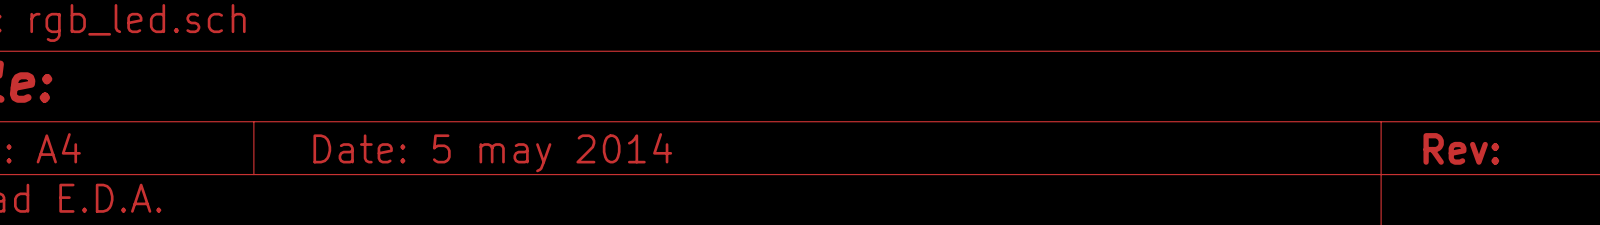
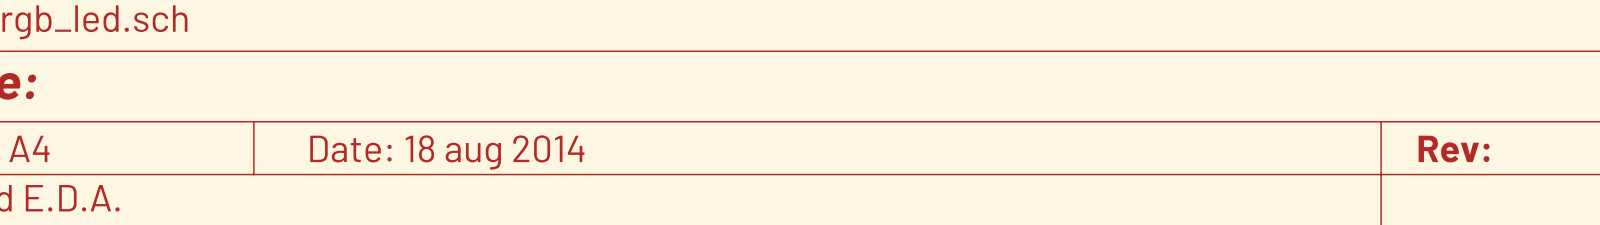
title block: Date: 5 may 2014 (492, 152) -> Date: 18 aug 2014 (447, 152)

